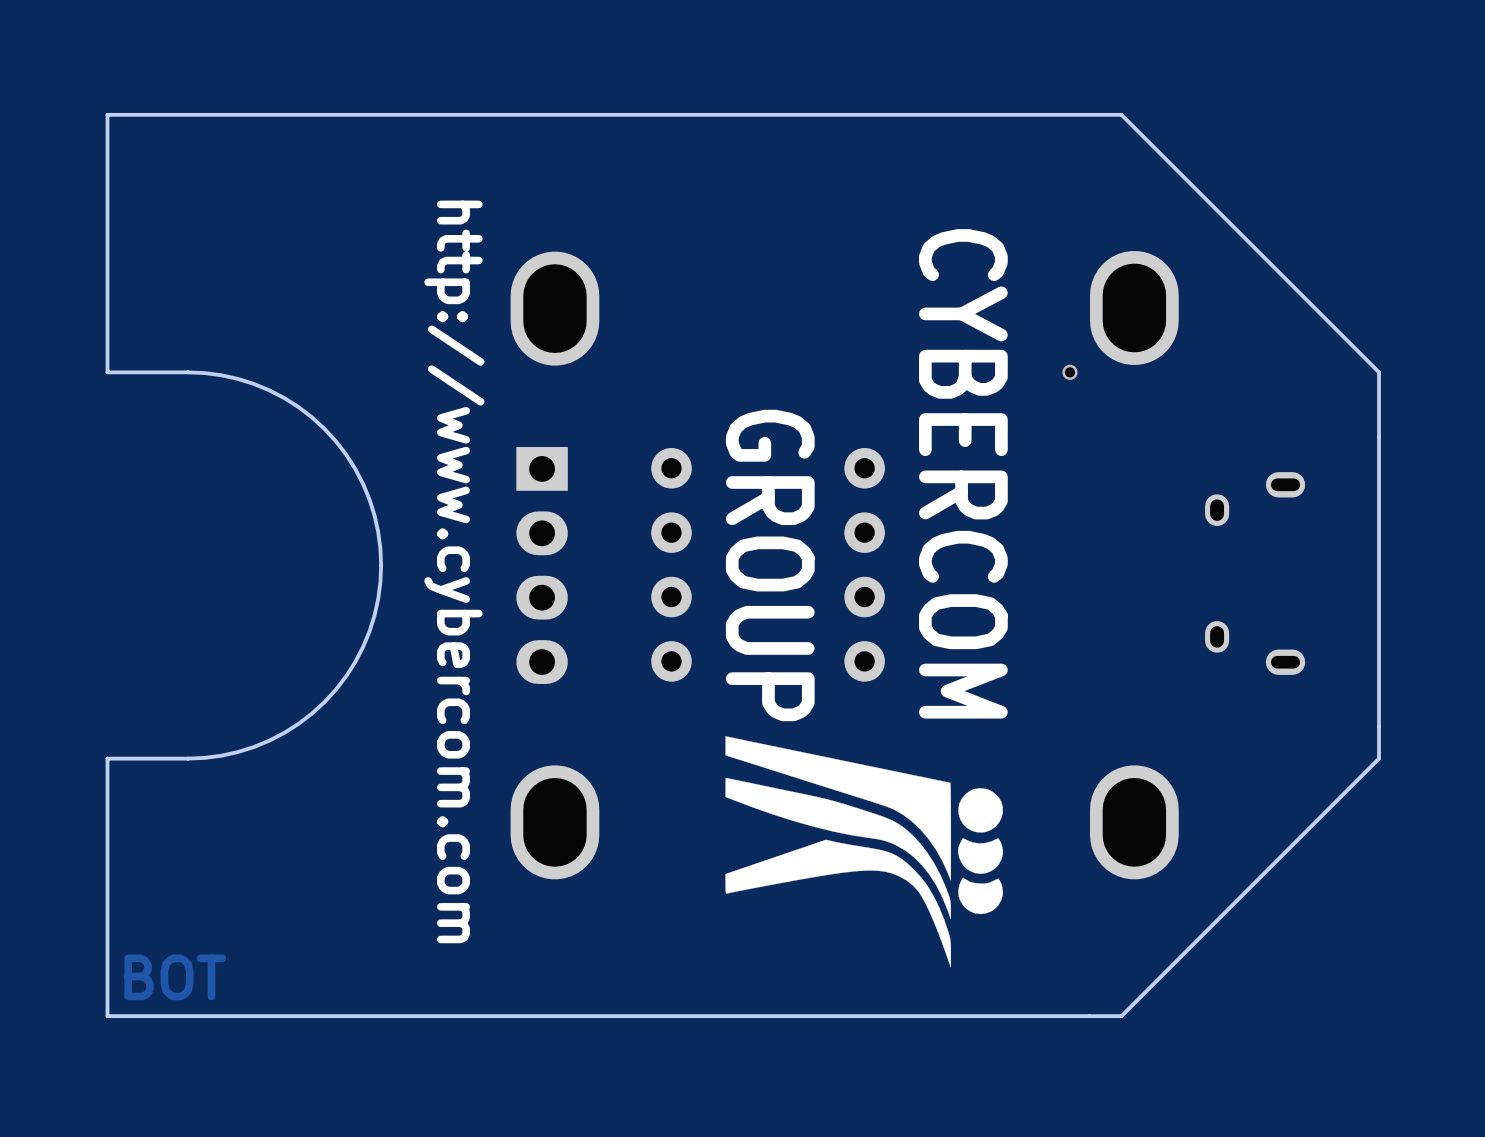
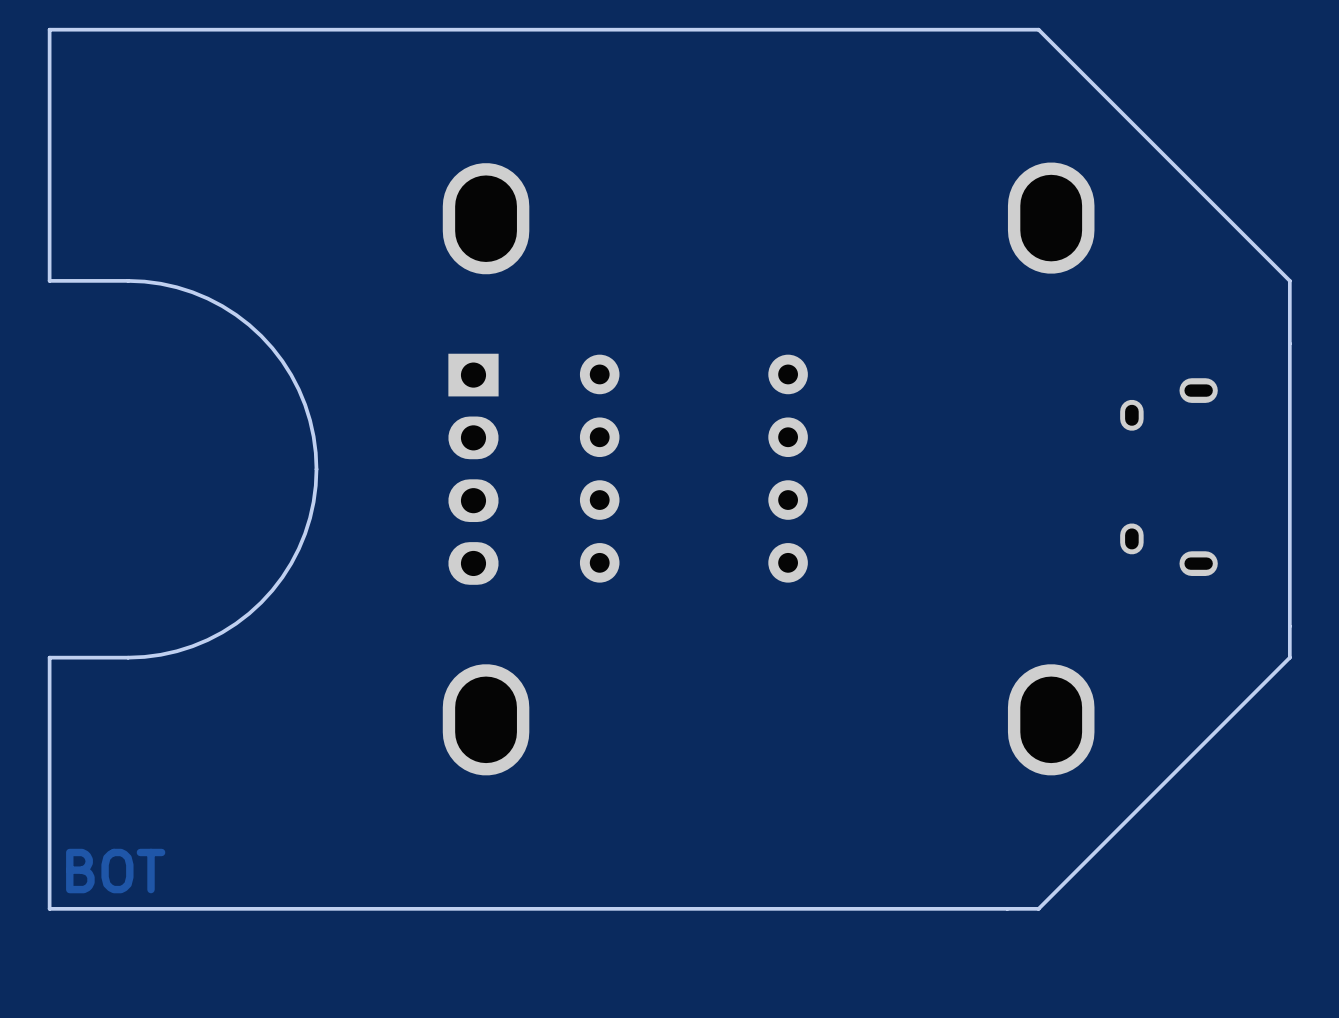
via: (1070, 372) -> none
text: CYBERCOM (963, 473) -> none
text: GROUP (770, 565) -> none
text: http://www.cybercom.com (454, 571) -> none
drawing: [725, 736, 1004, 968] -> none

